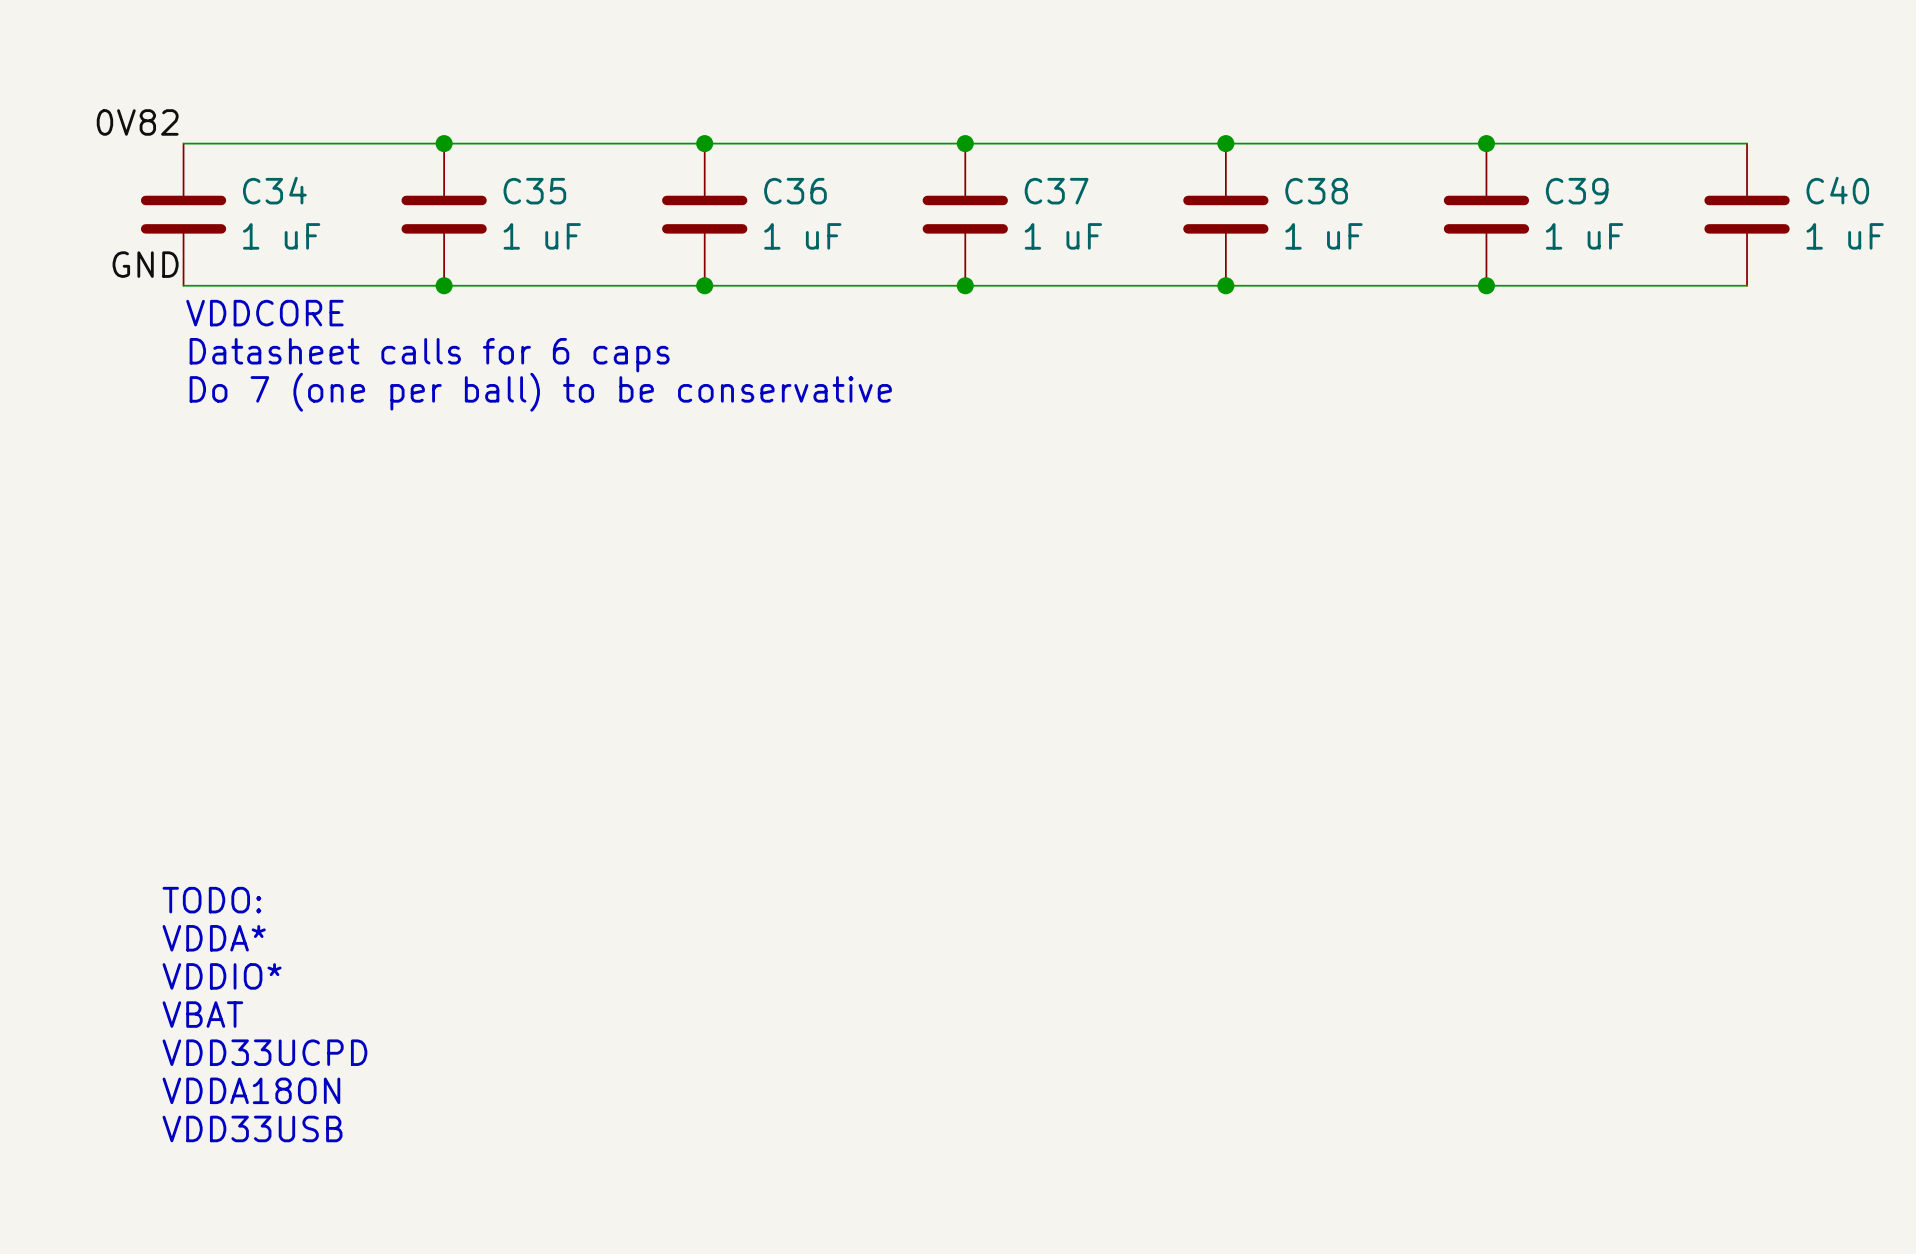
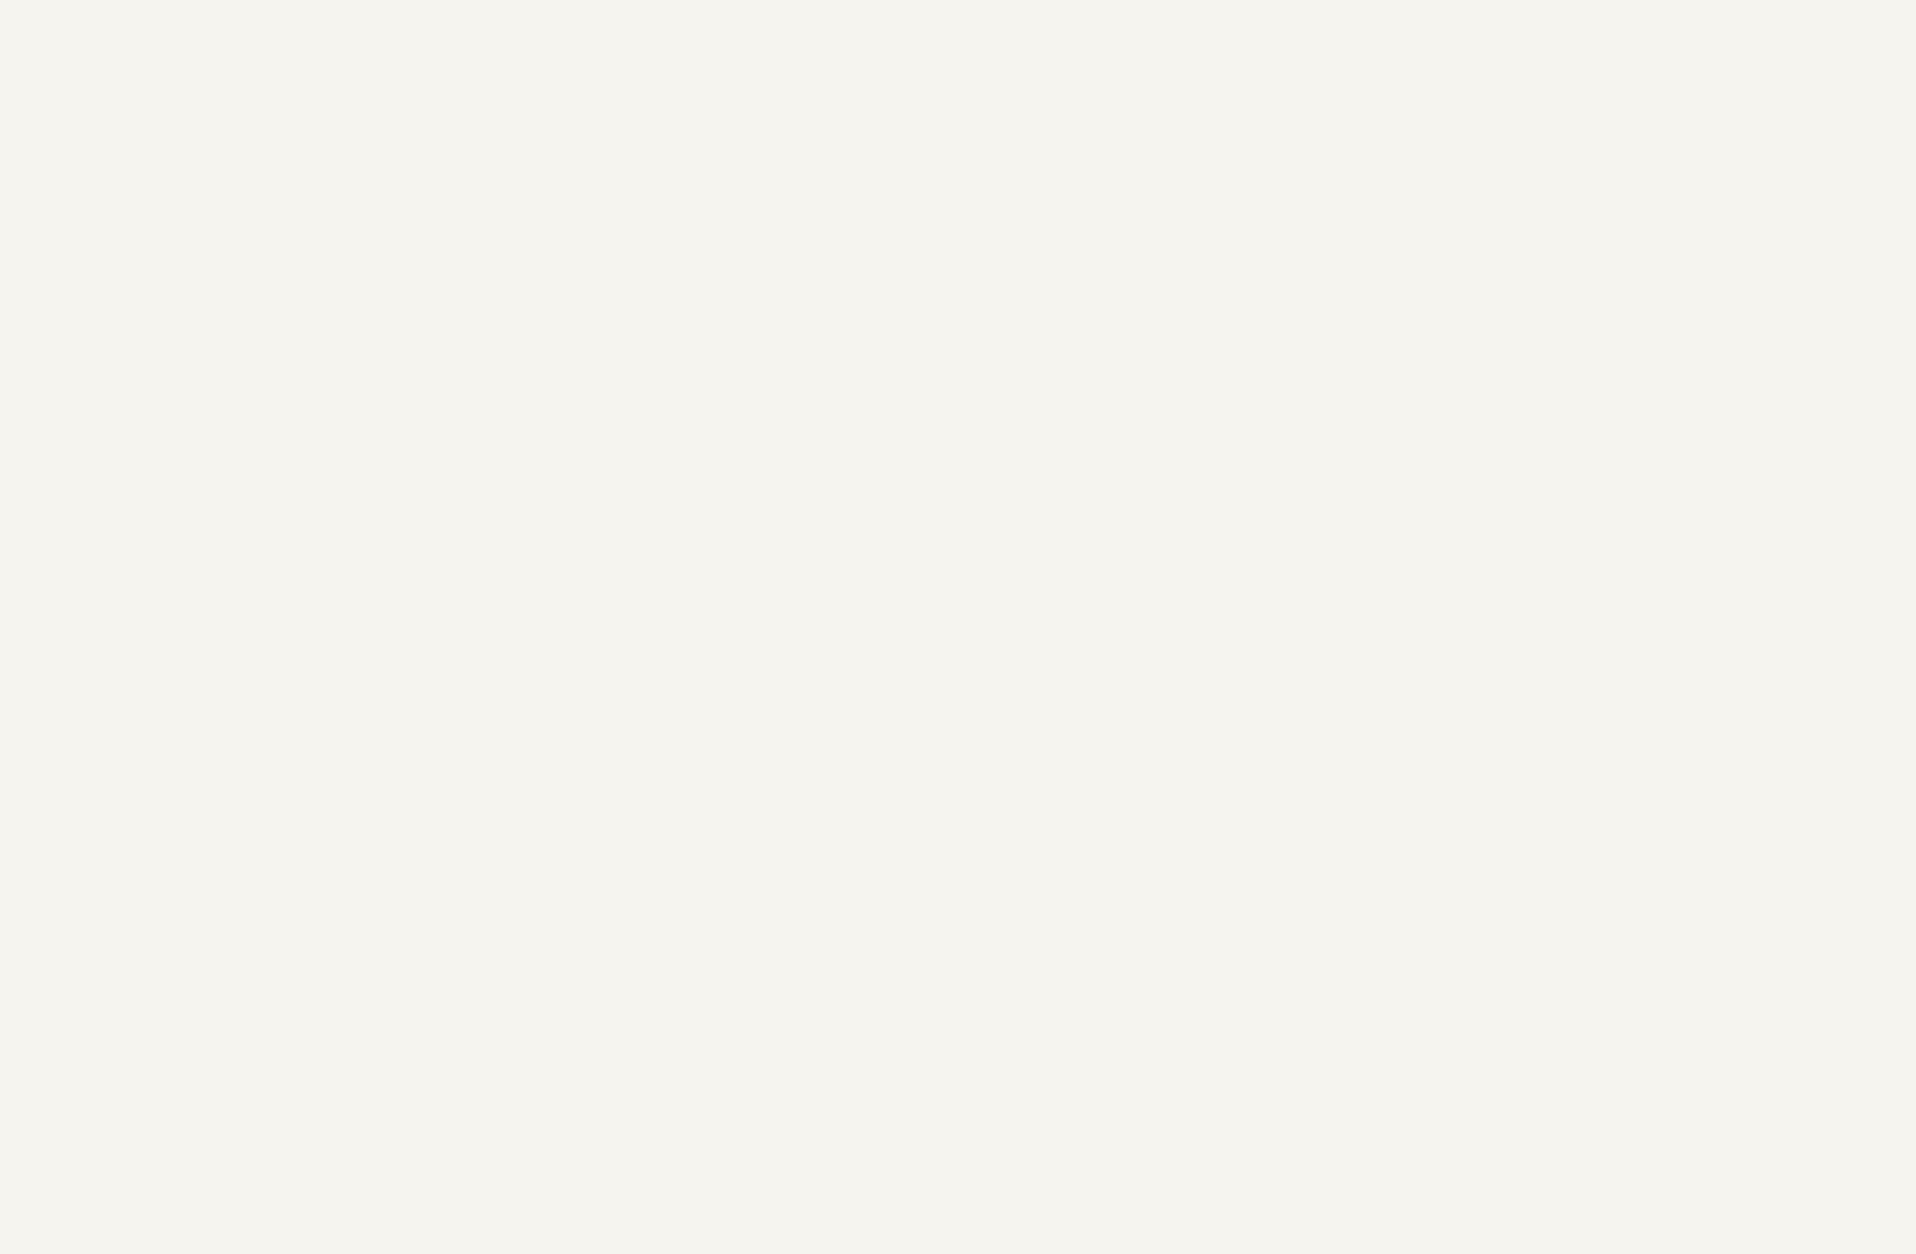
label: 0V82 (137, 122) -> none
wire: (183, 143) (1747, 143) -> none
junction: (444, 143) -> none
junction: (704, 143) -> none
junction: (965, 143) -> none
junction: (1225, 143) -> none
junction: (1486, 143) -> none
C34: 1 uF (183, 214) -> none
C35: 1 uF (444, 214) -> none
C36: 1 uF (704, 214) -> none
C37: 1 uF (965, 214) -> none
C38: 1 uF (1225, 214) -> none
C39: 1 uF (1486, 214) -> none
C40: 1 uF (1747, 214) -> none
label: GND (145, 264) -> none
wire: (183, 285) (1747, 285) -> none
junction: (444, 285) -> none
junction: (704, 285) -> none
junction: (965, 285) -> none
junction: (1225, 285) -> none
junction: (1486, 285) -> none
text: VDDCORE (264, 313) -> none
text: Datasheet calls for 6 caps (429, 355) -> none
text: Do 7 (one per ball) to be conservative (540, 392) -> none
text: TODO: (211, 900) -> none
text: VDDA* (214, 938) -> none
text: VDDIO* (222, 976) -> none
text: VBAT (202, 1014) -> none
text: VDD33UCPD (264, 1052) -> none
text: VDDA18ON (251, 1090) -> none
text: VDD33USB (252, 1128) -> none

